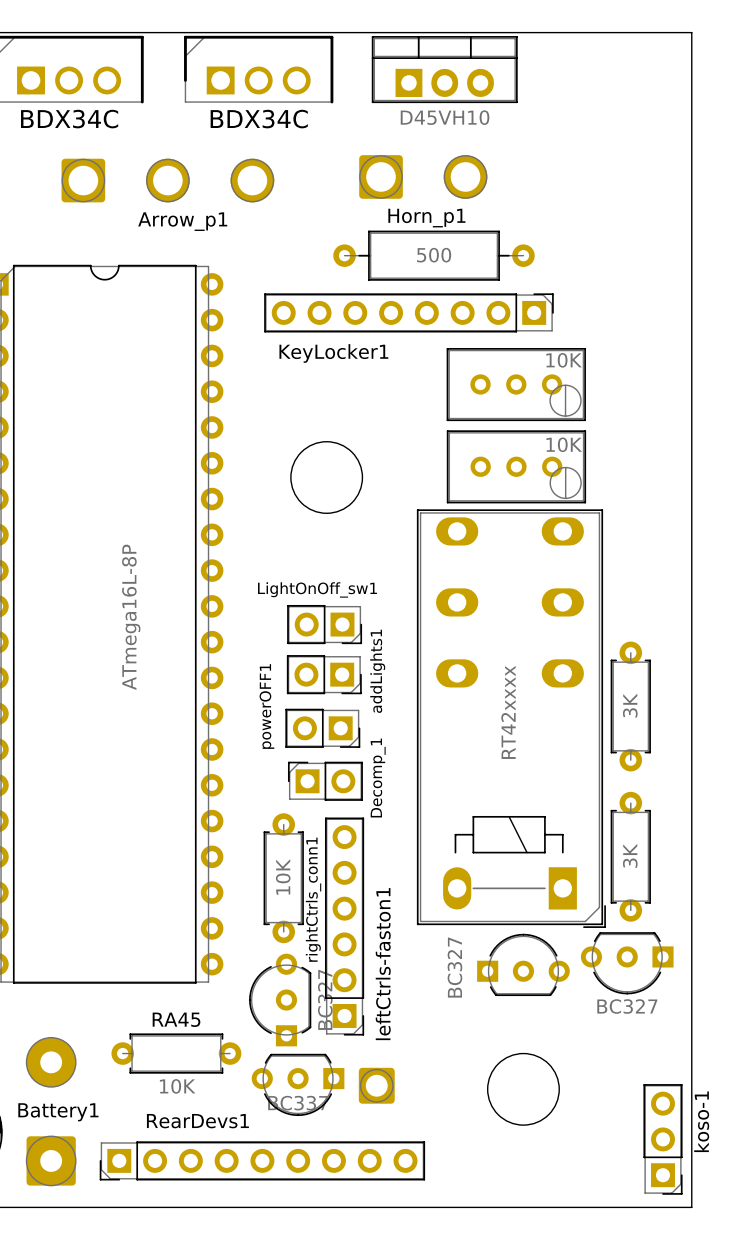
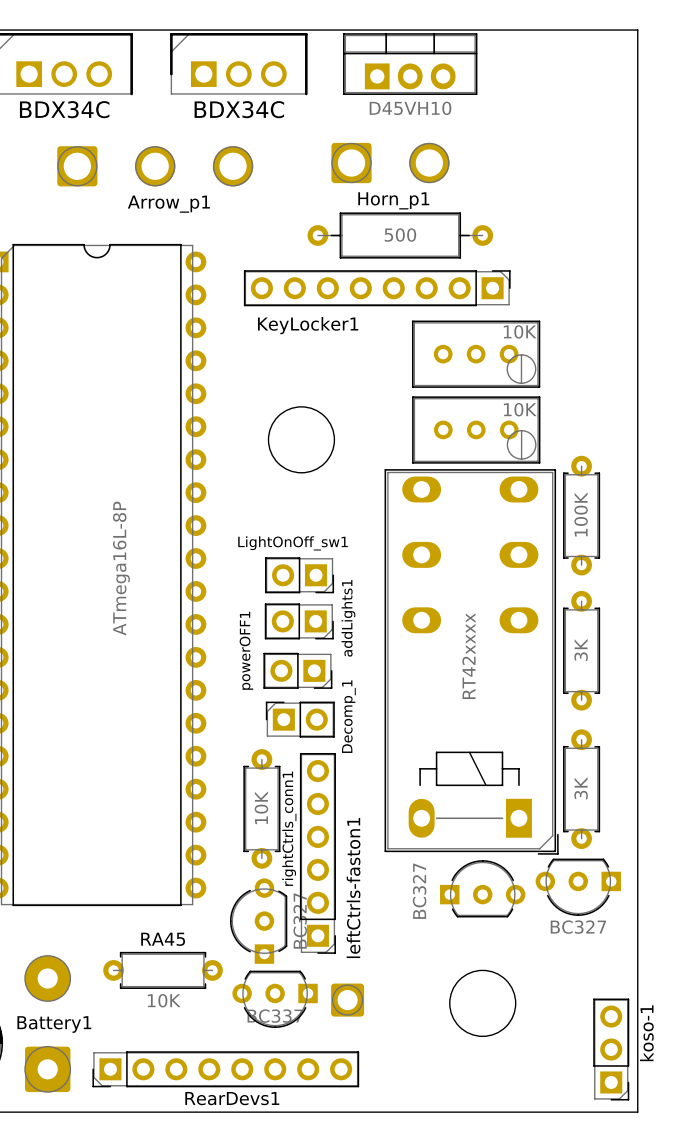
part: none -> 100K (581, 515)
RearDevs1 name position: RearDevs1 (197, 1121) -> RearDevs1 (232, 1098)
RearDevs1 footprint: [99, 1141, 426, 1181] -> [92, 1051, 360, 1088]

